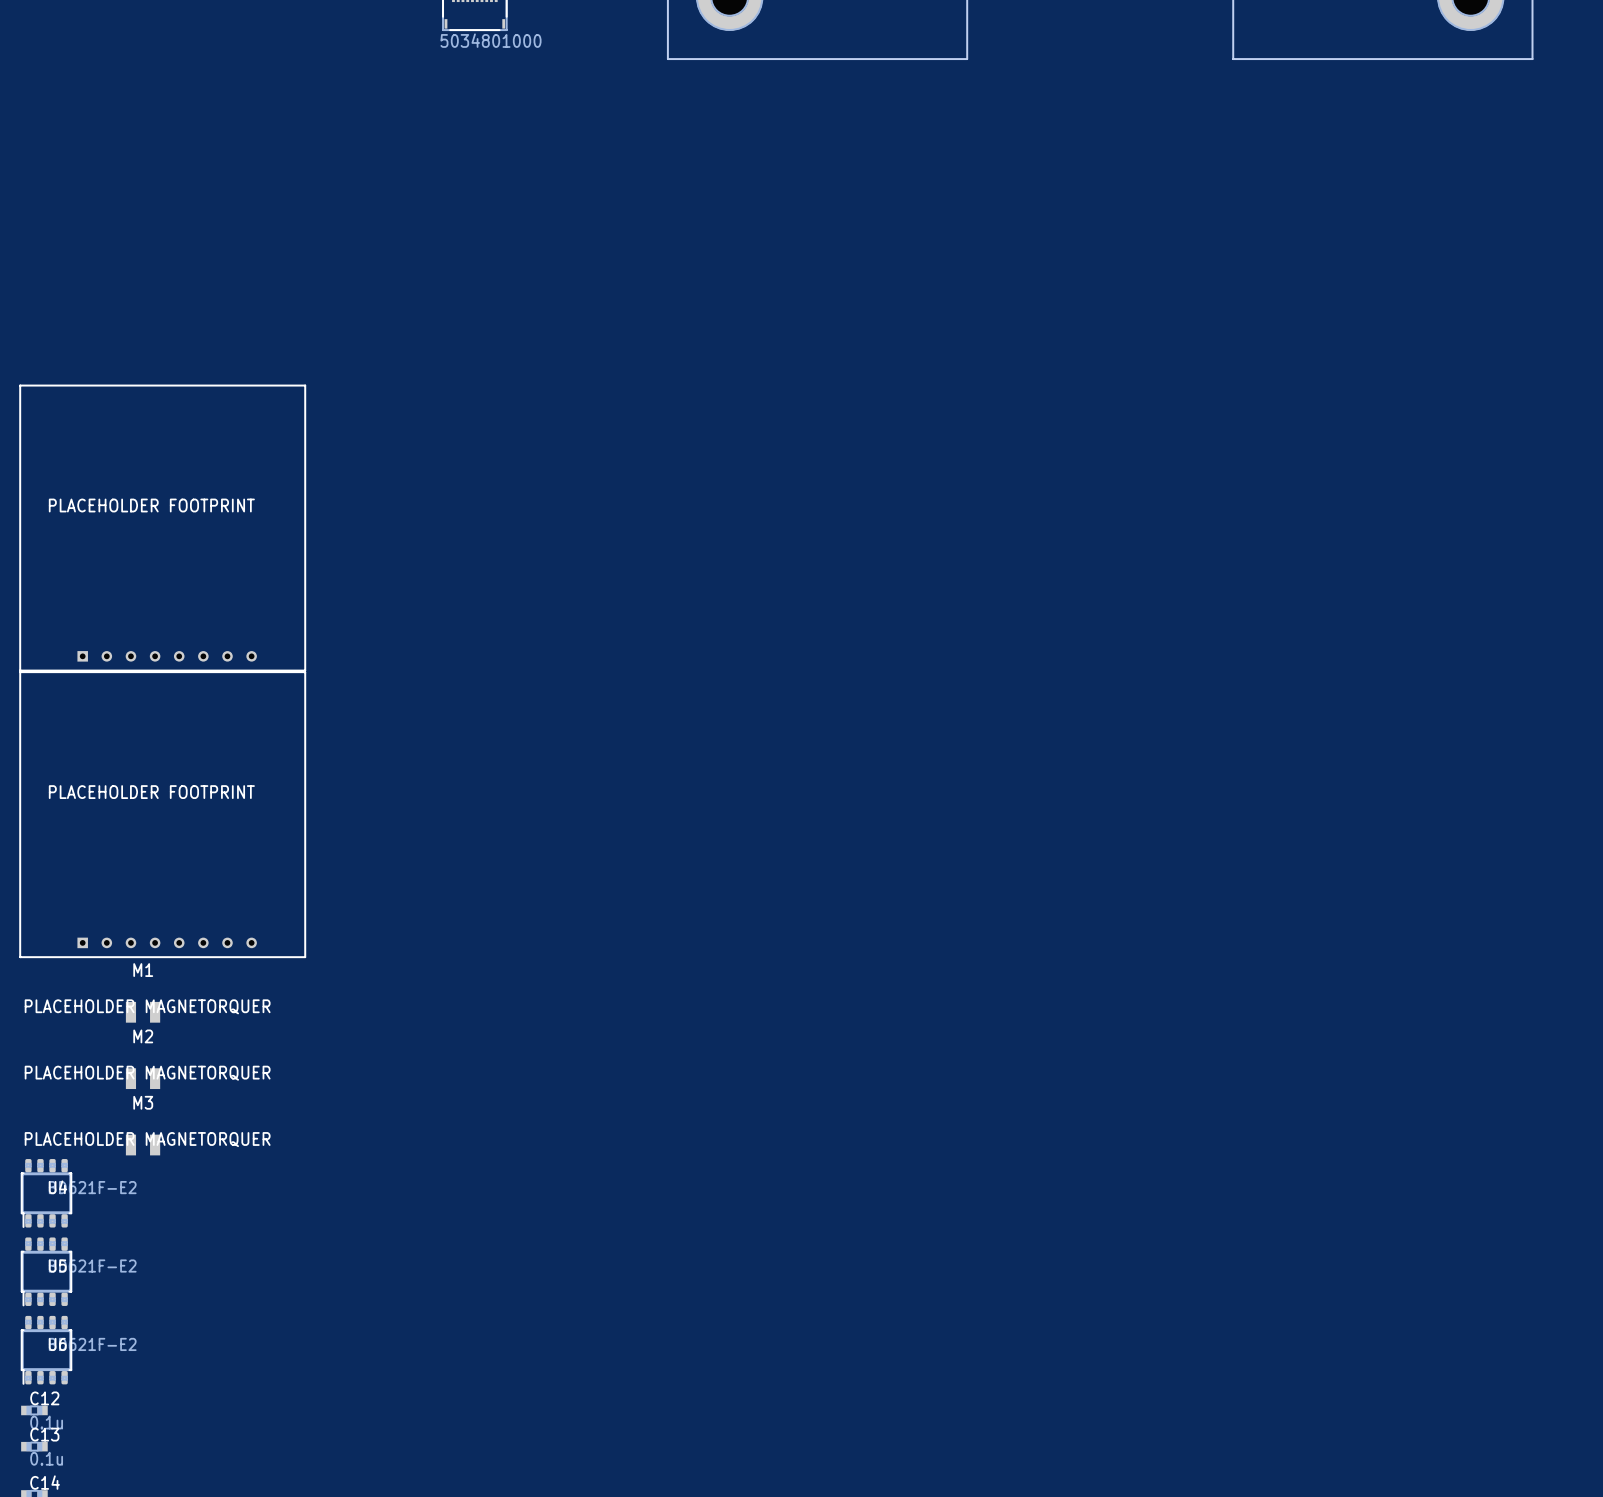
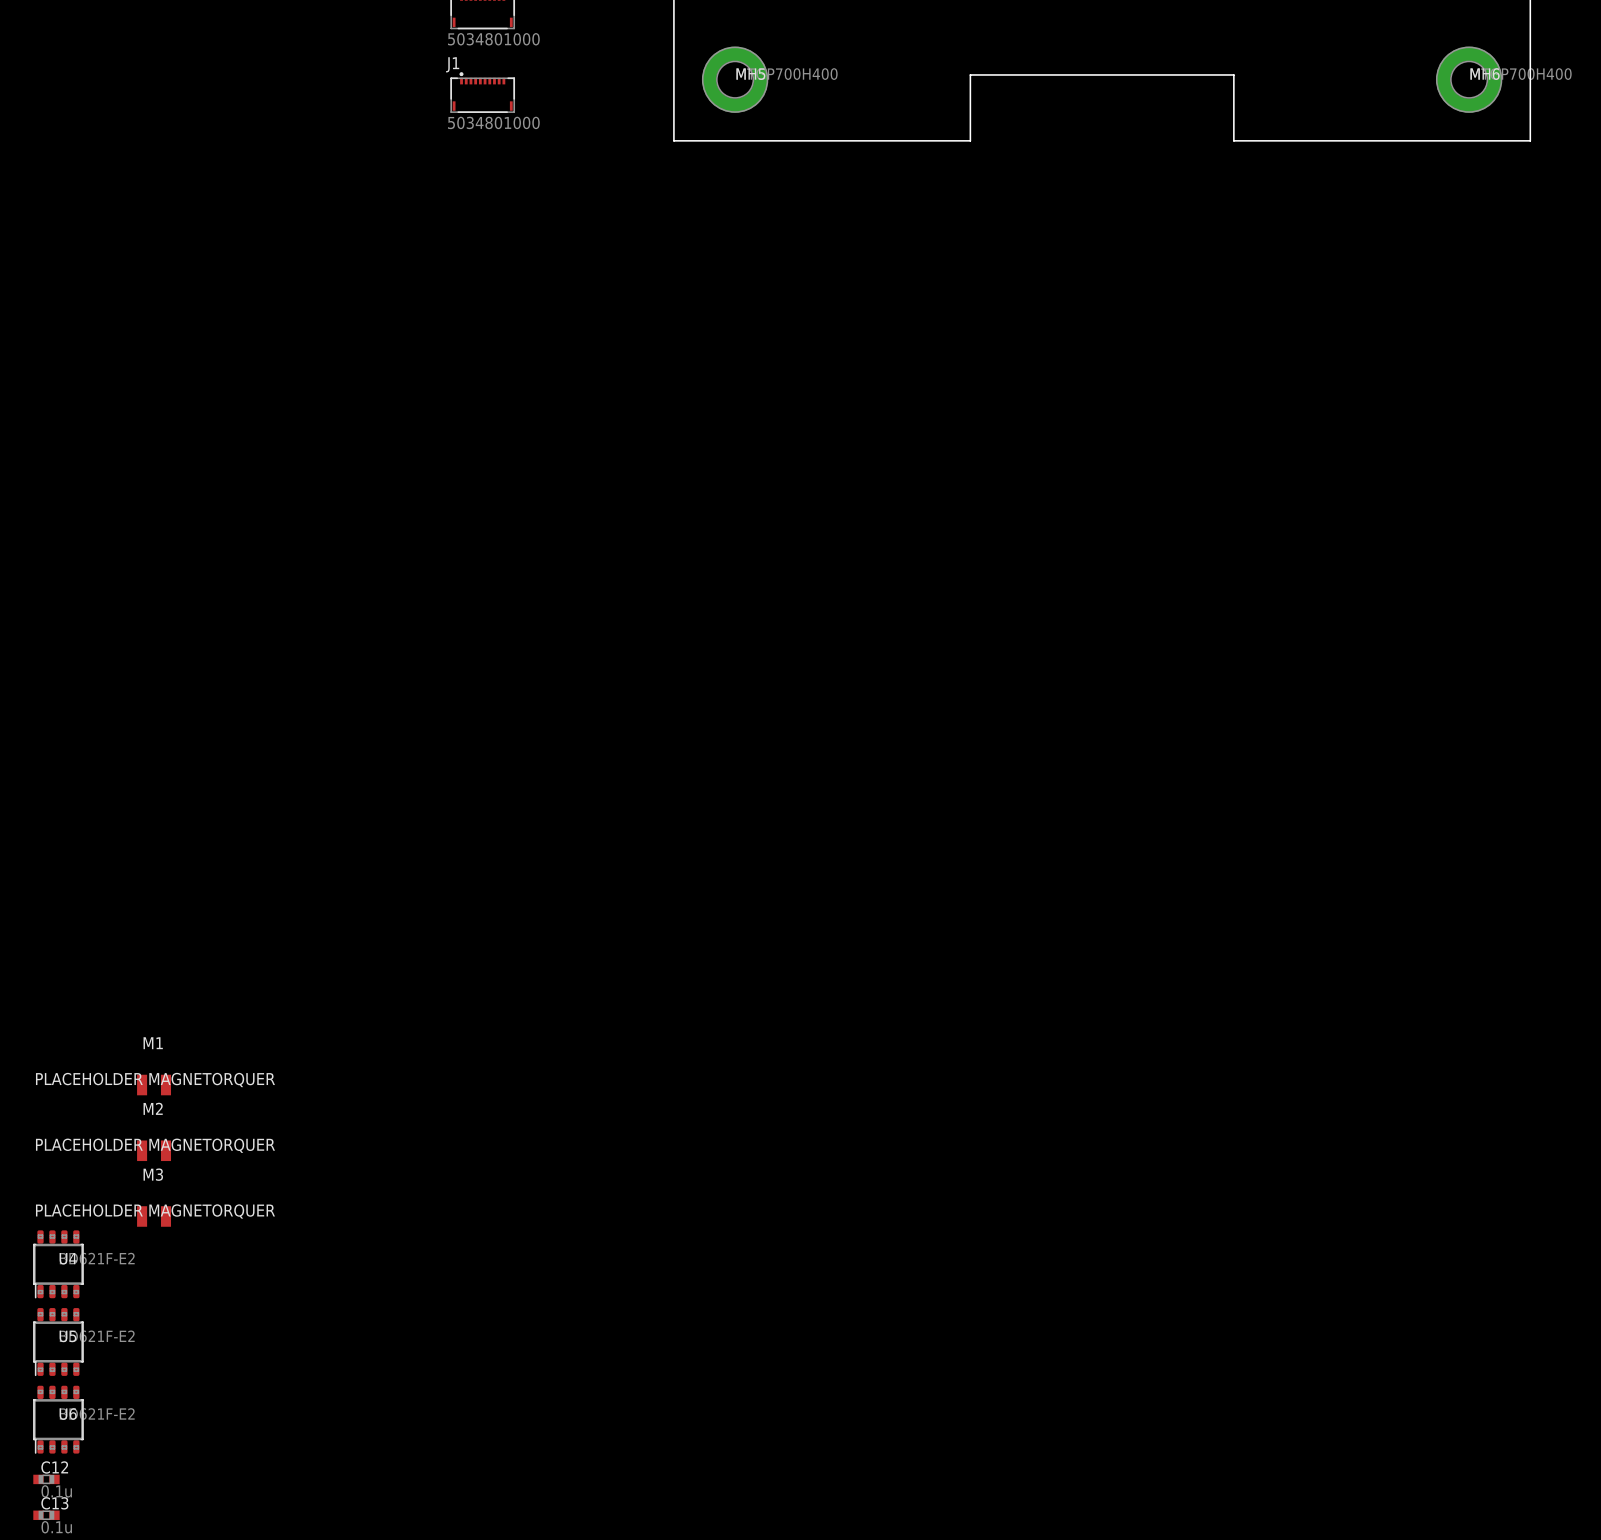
part: (162, 528) -> none
part: (162, 814) -> none

